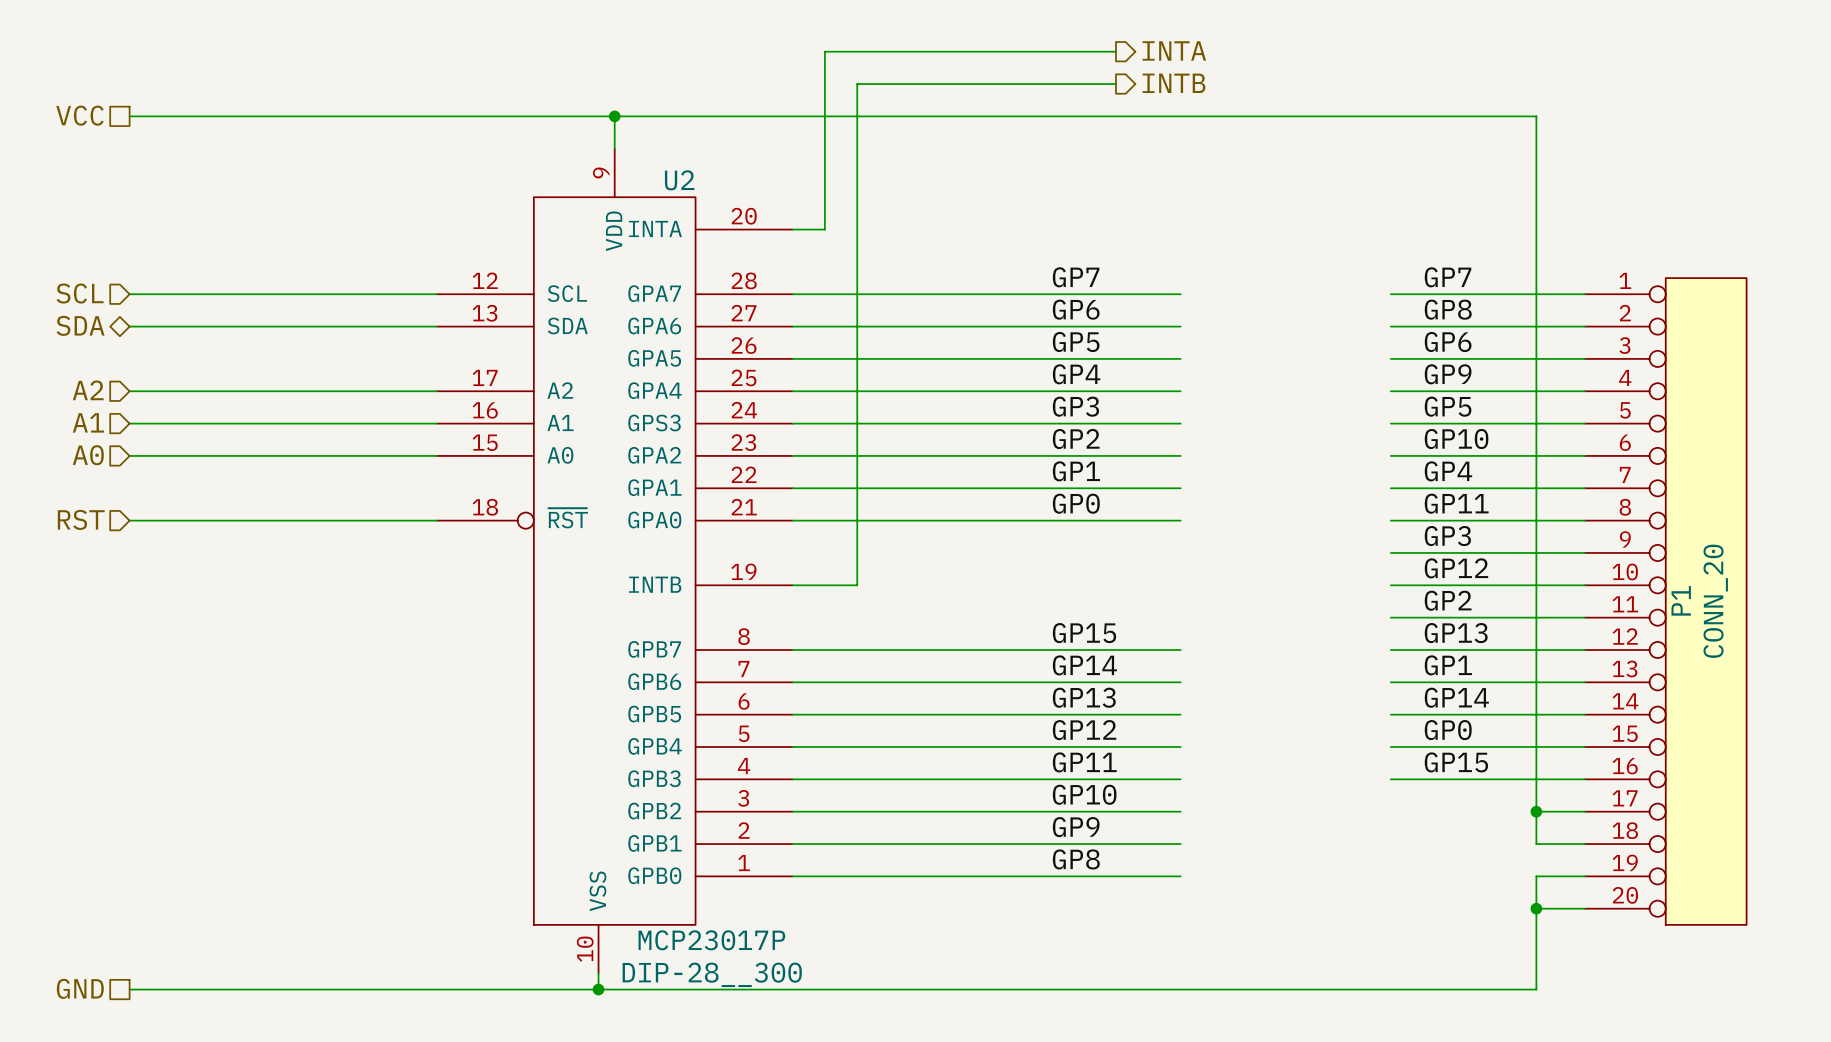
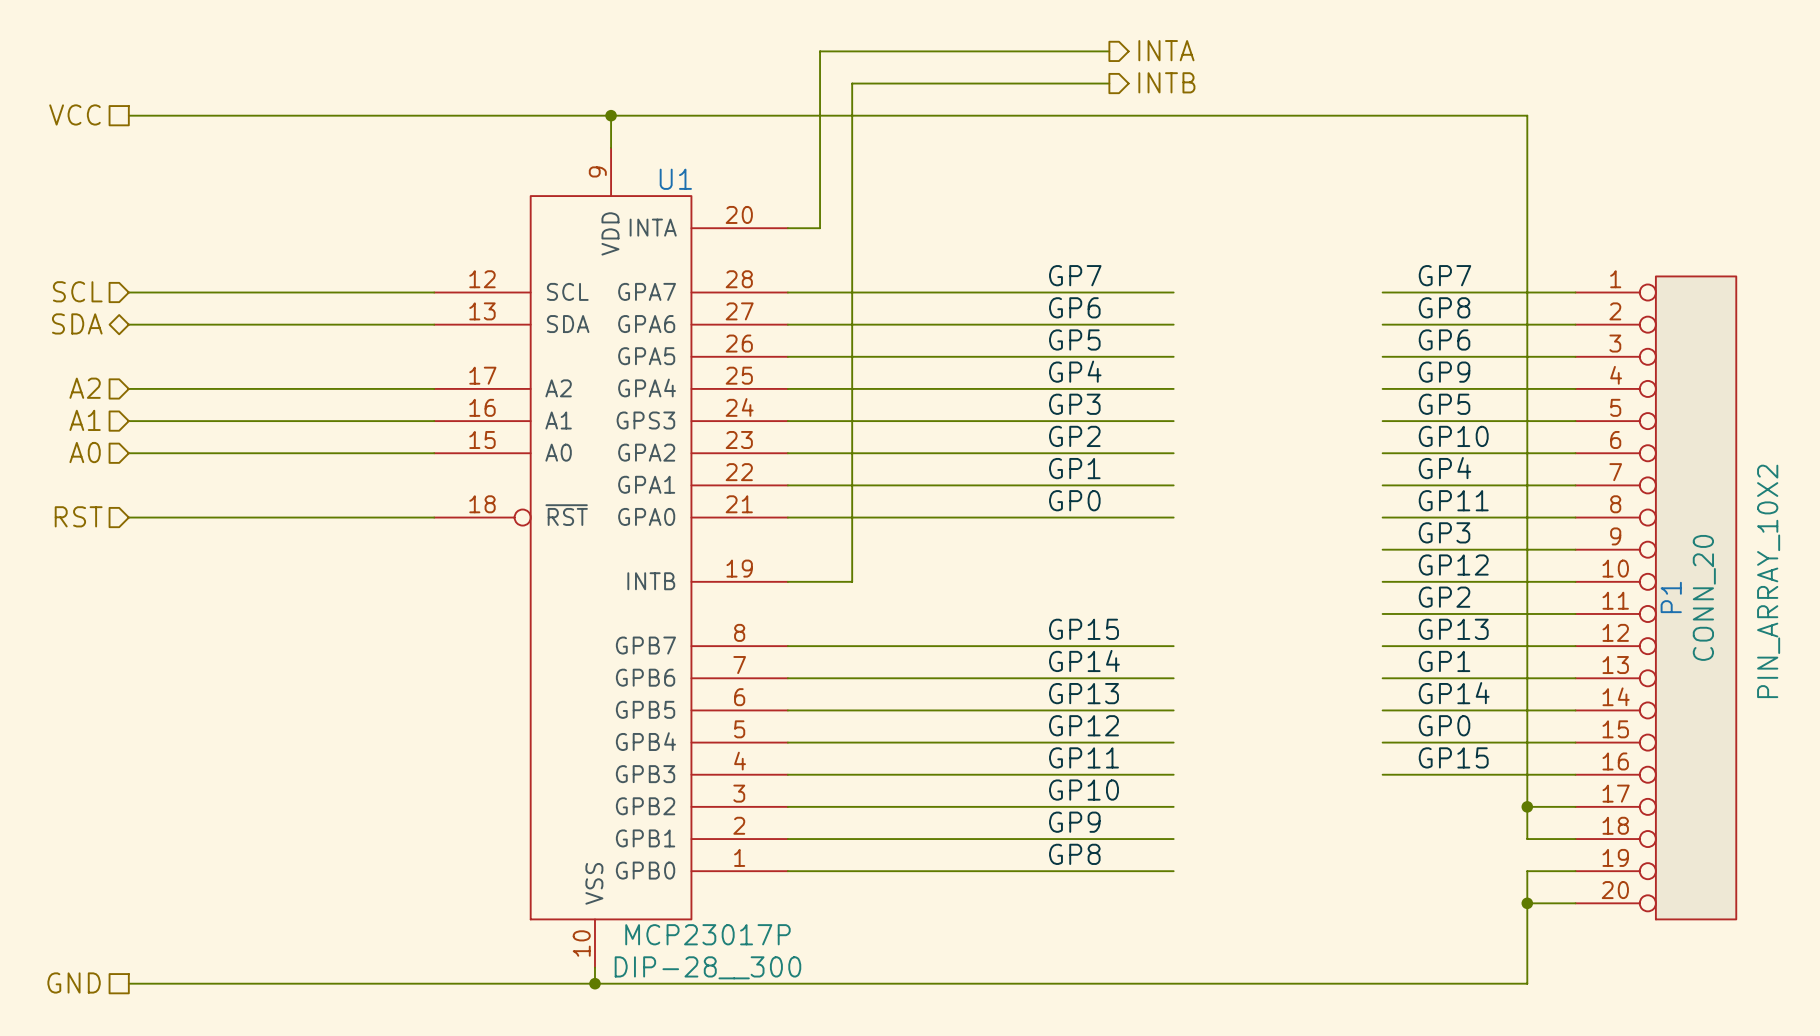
U2 name: U2 (679, 180) -> U1 (675, 179)
P1 text: none -> PIN_ARRAY_10X2 (1768, 581)

